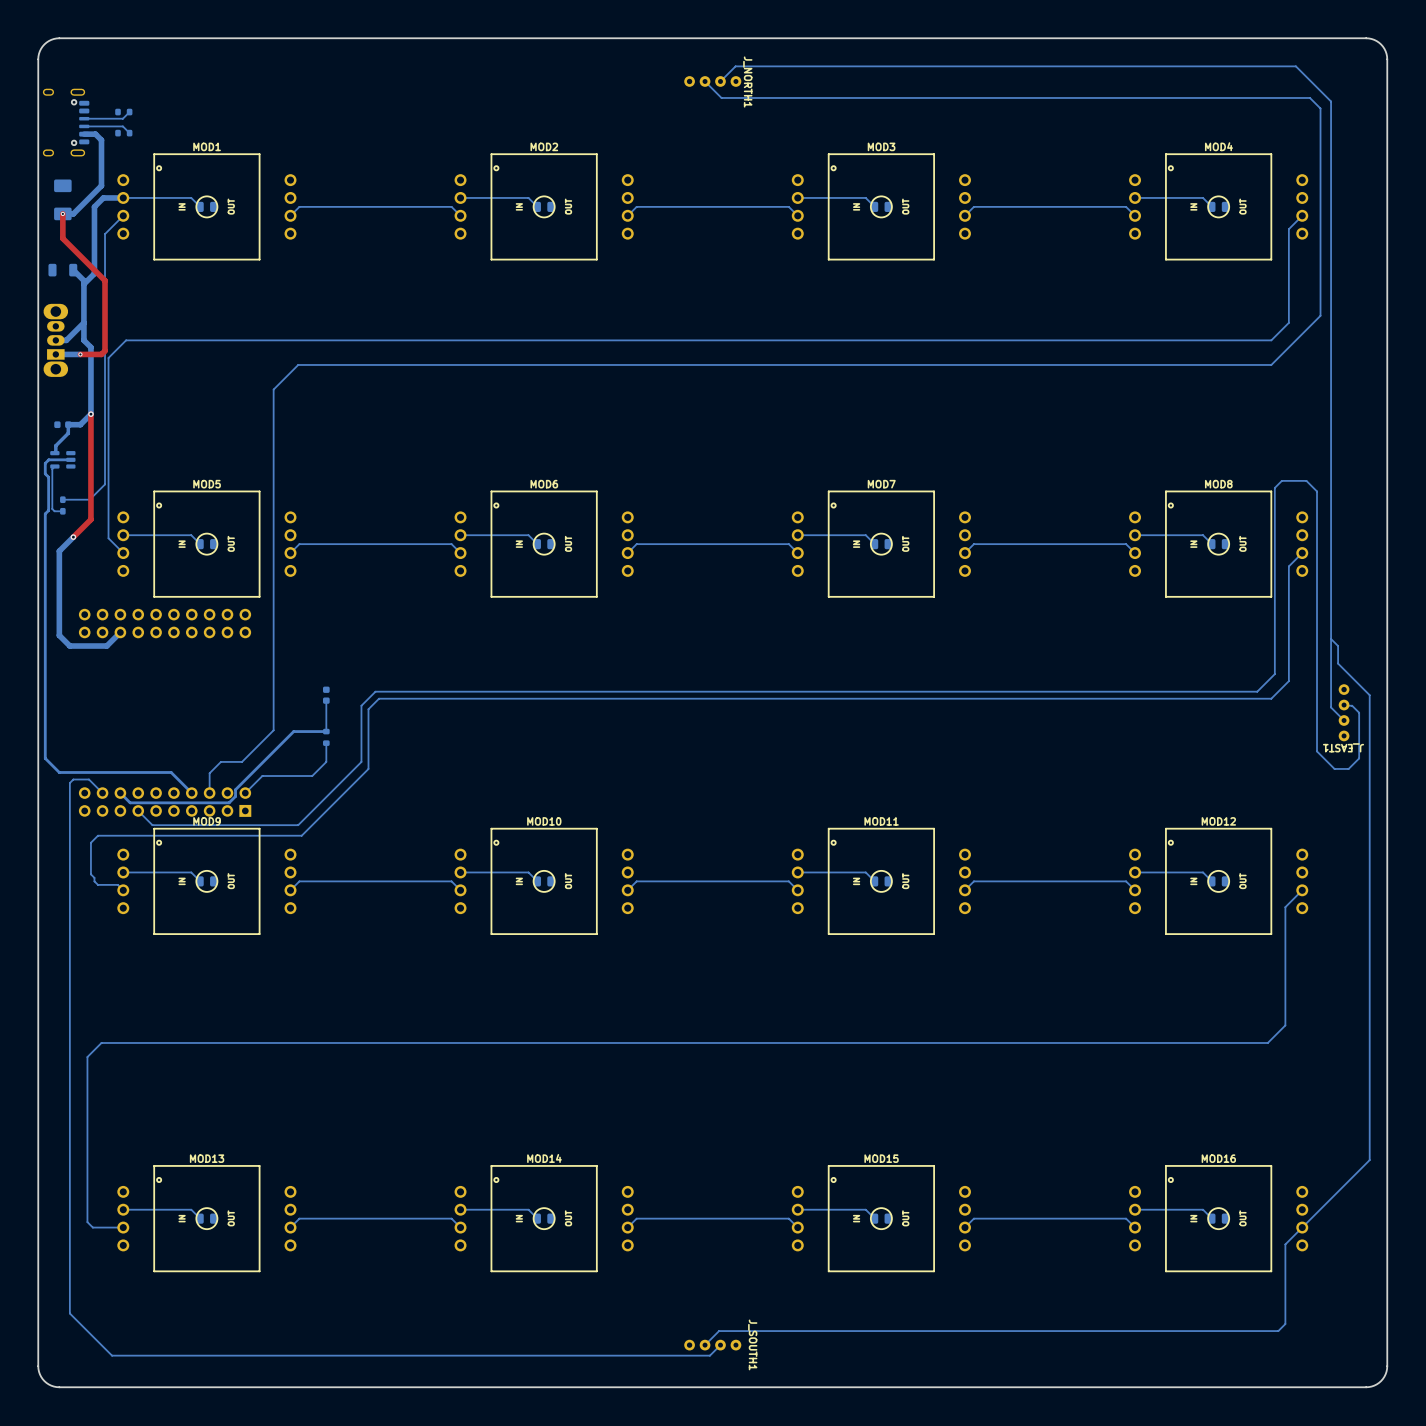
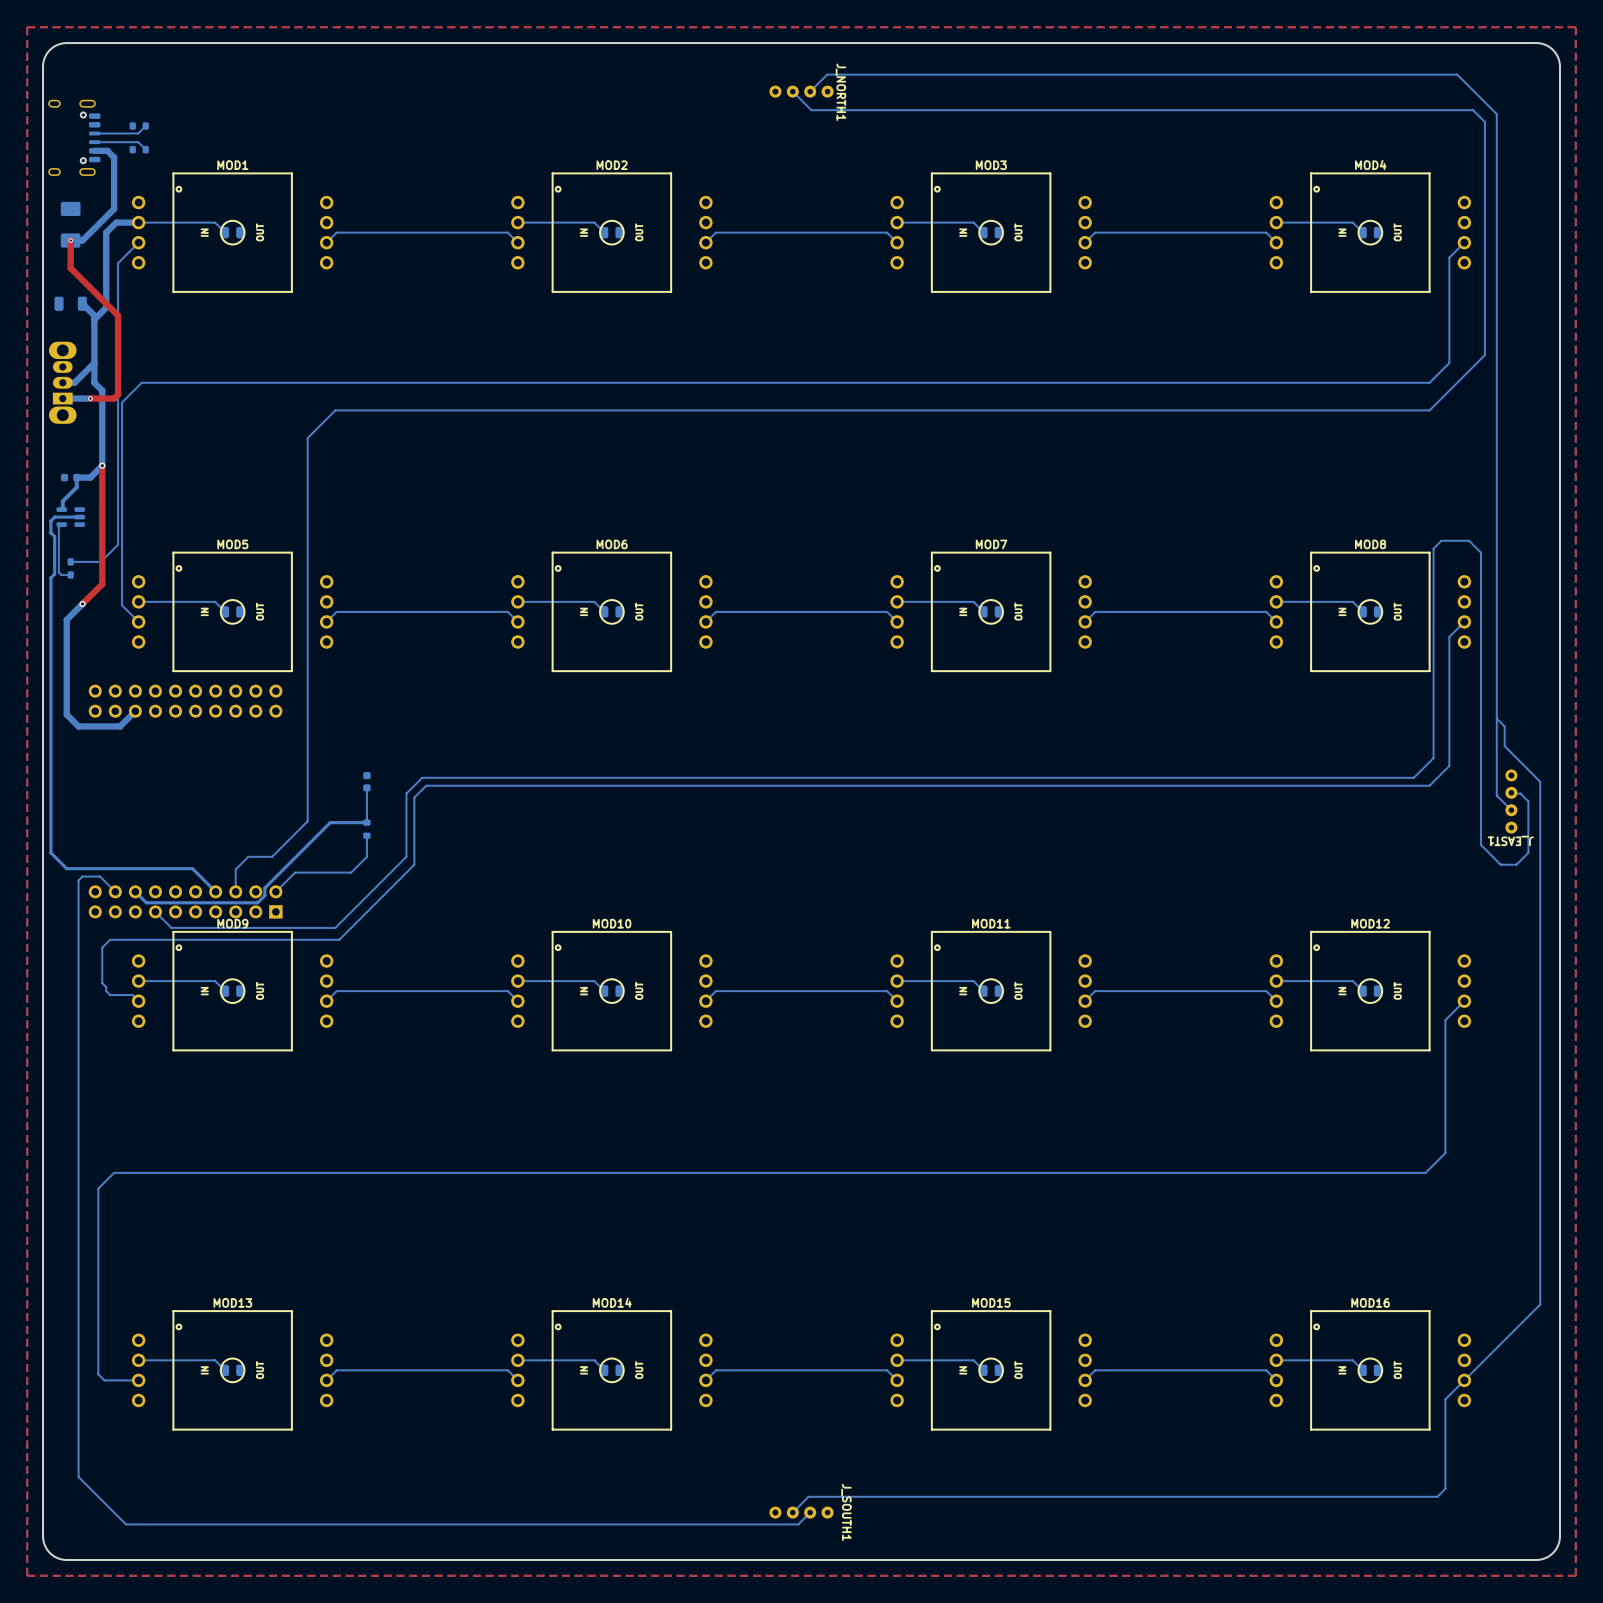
top zone outline: none -> (27, 27) (1575, 27) (1575, 1575) (27, 1575) (27, 27)

